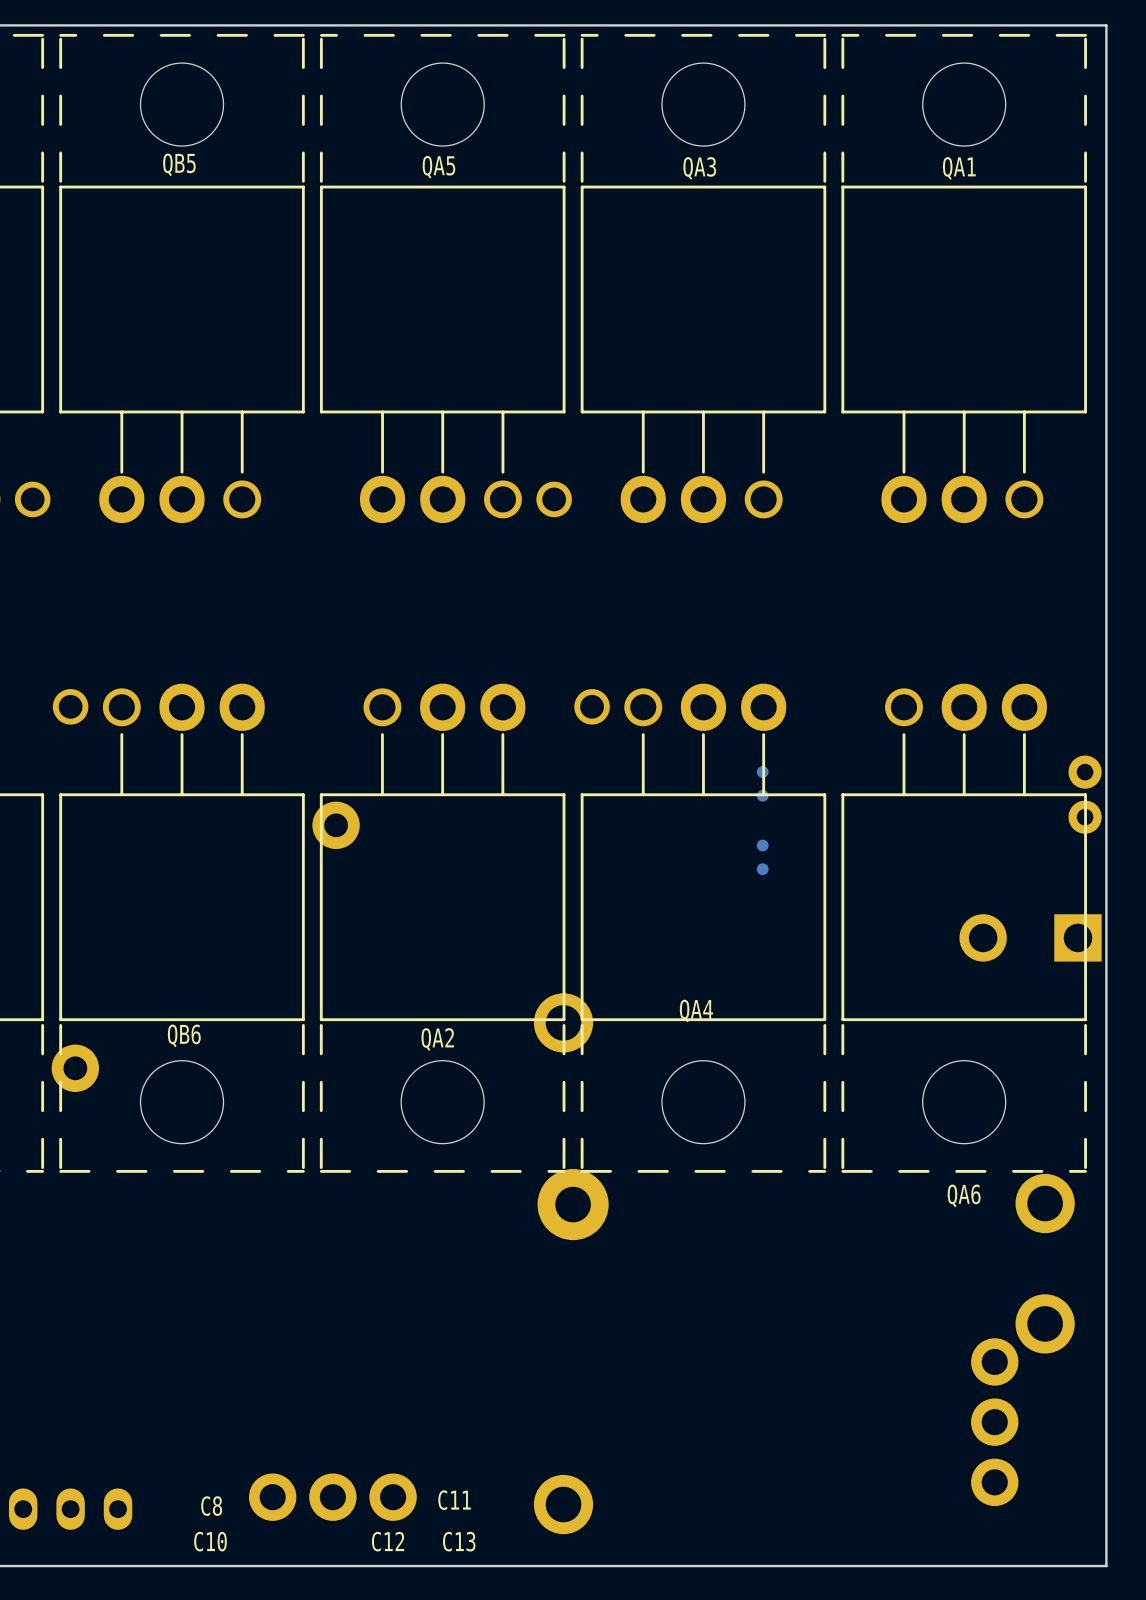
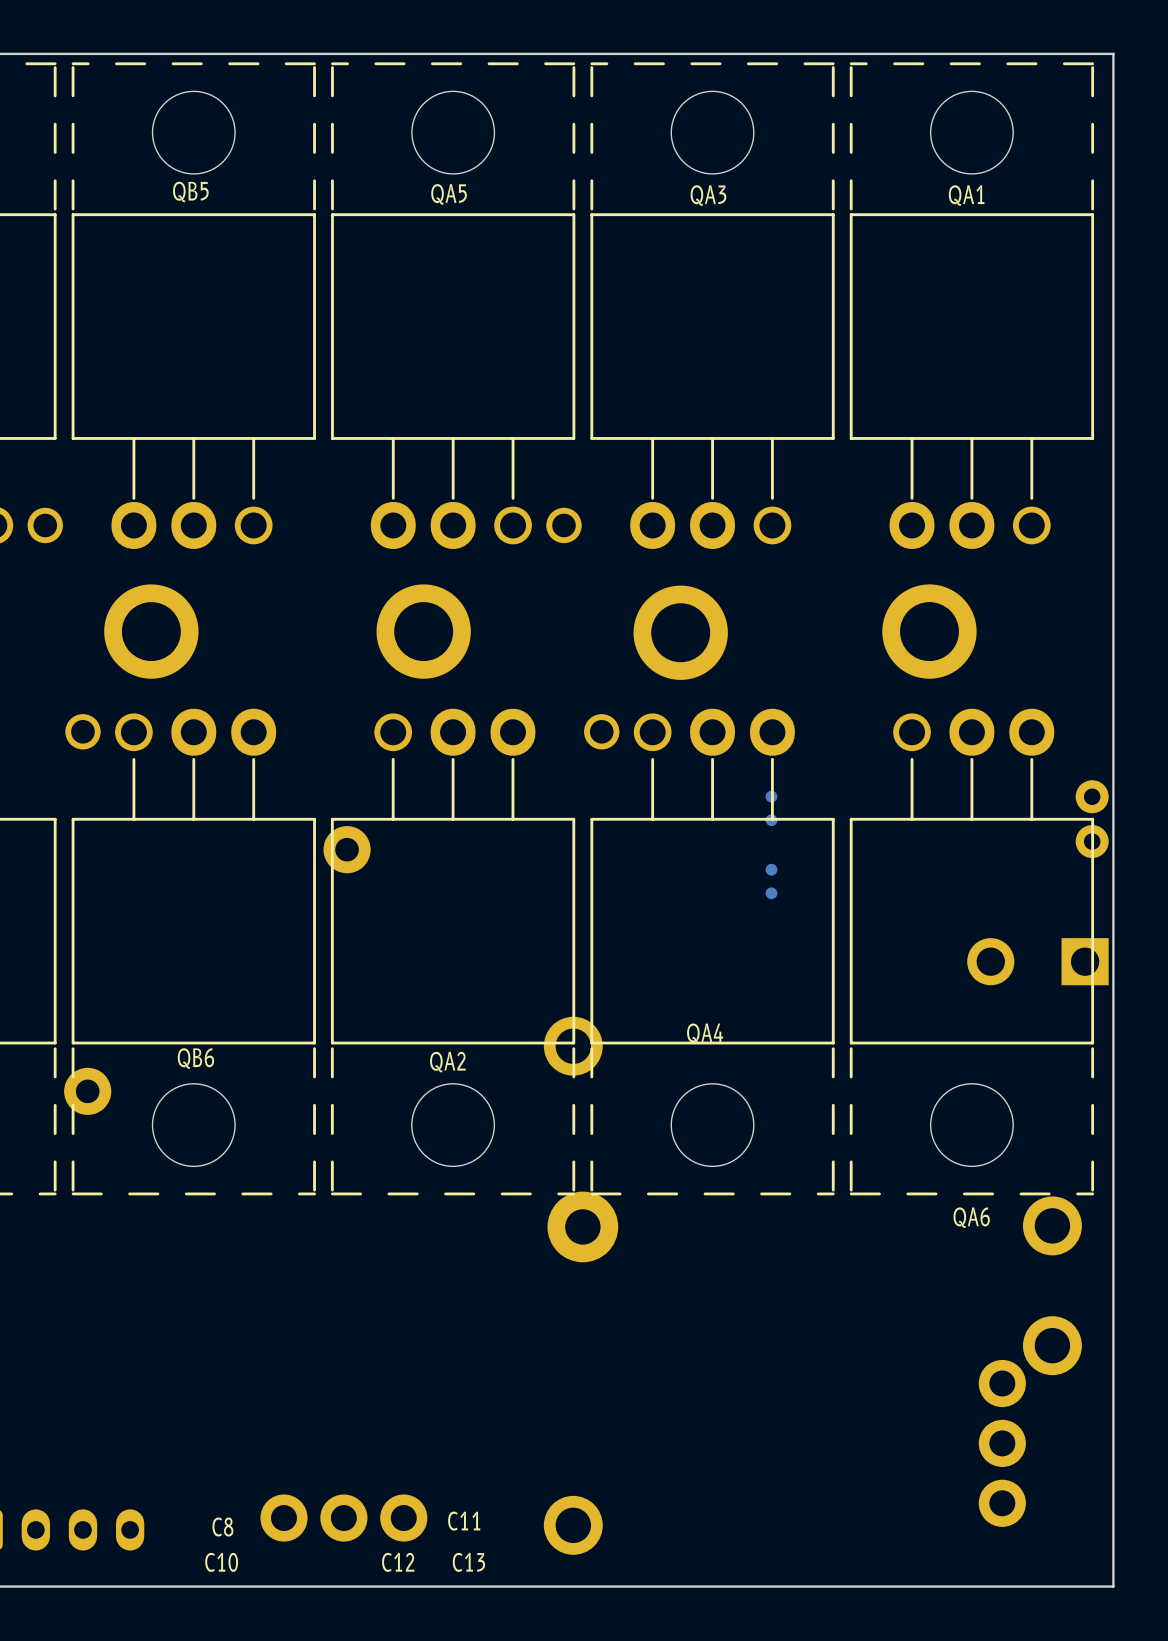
part: none -> (151, 631)
part: none -> (423, 631)
part: none -> (929, 631)
part: none -> (680, 632)

